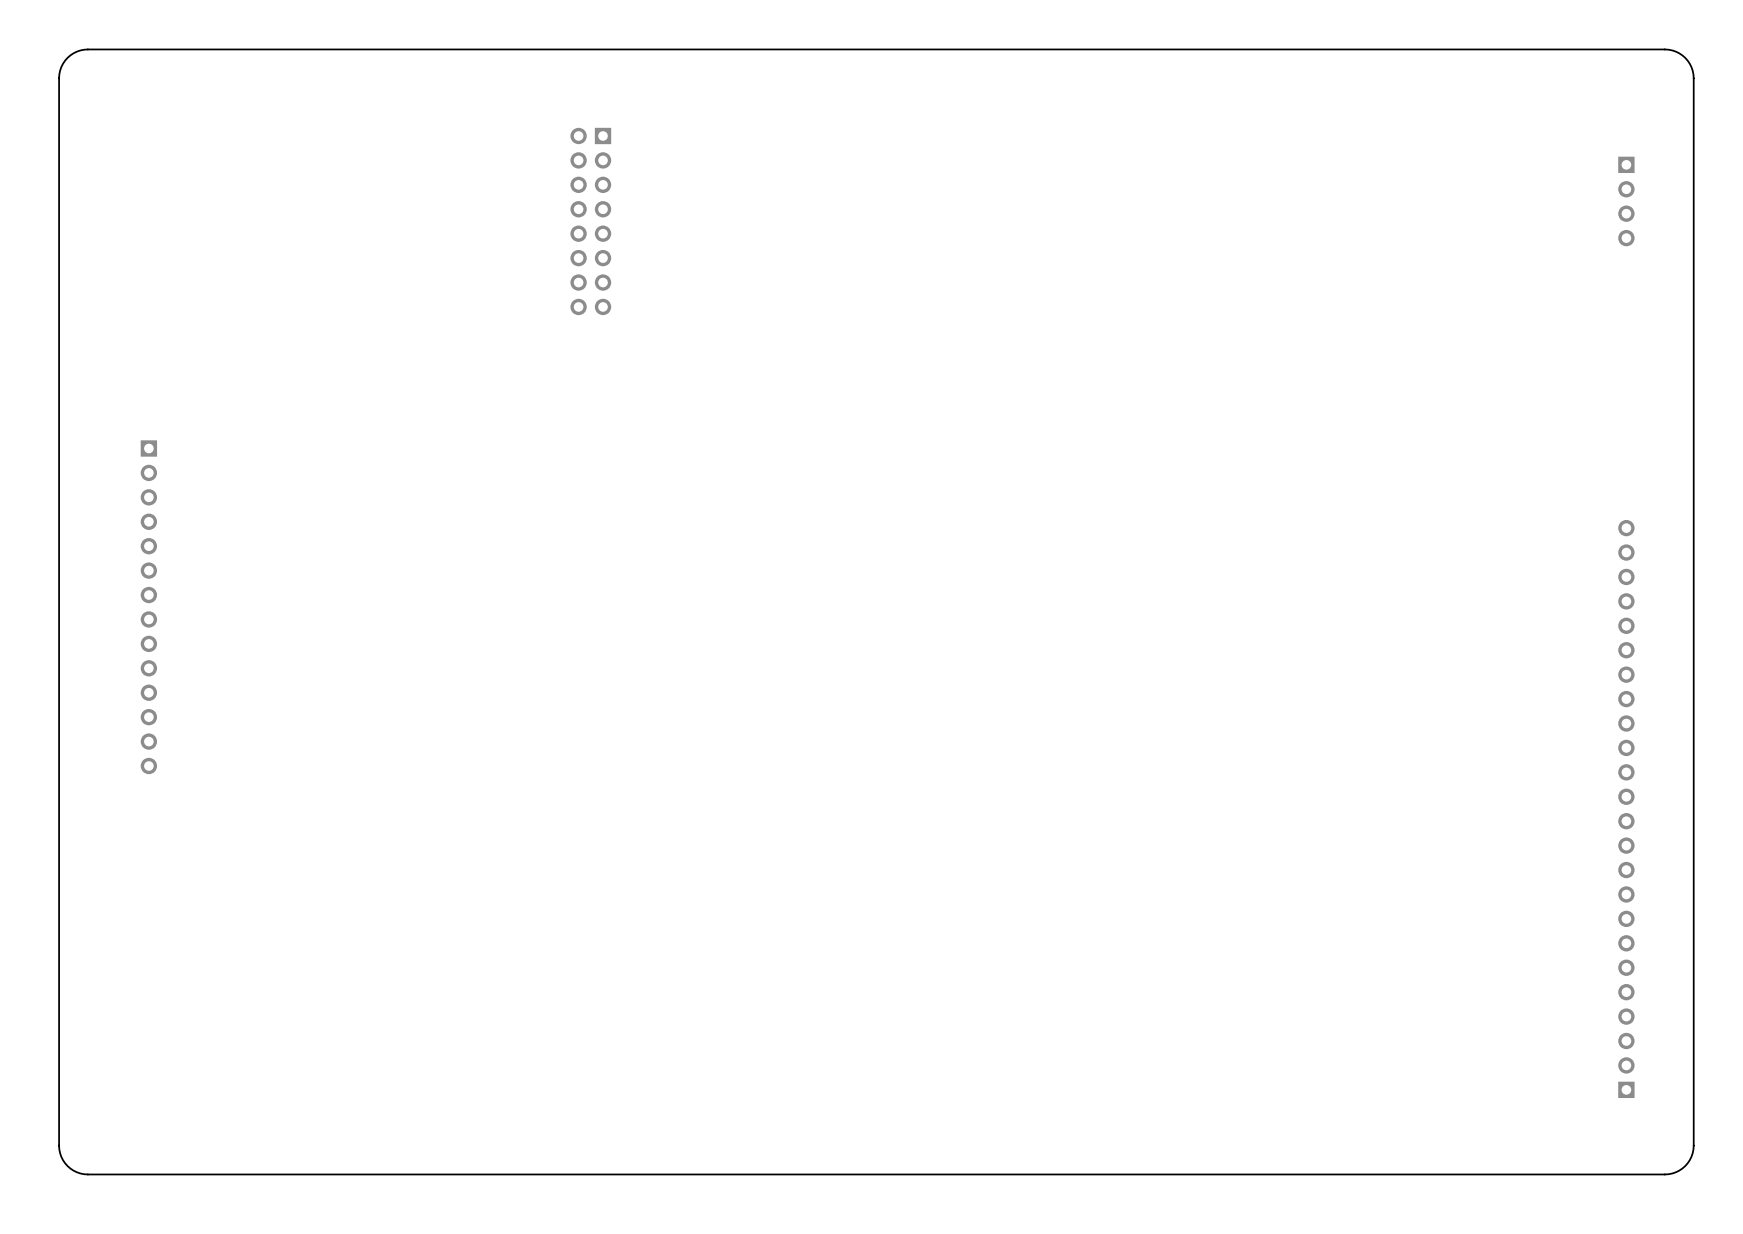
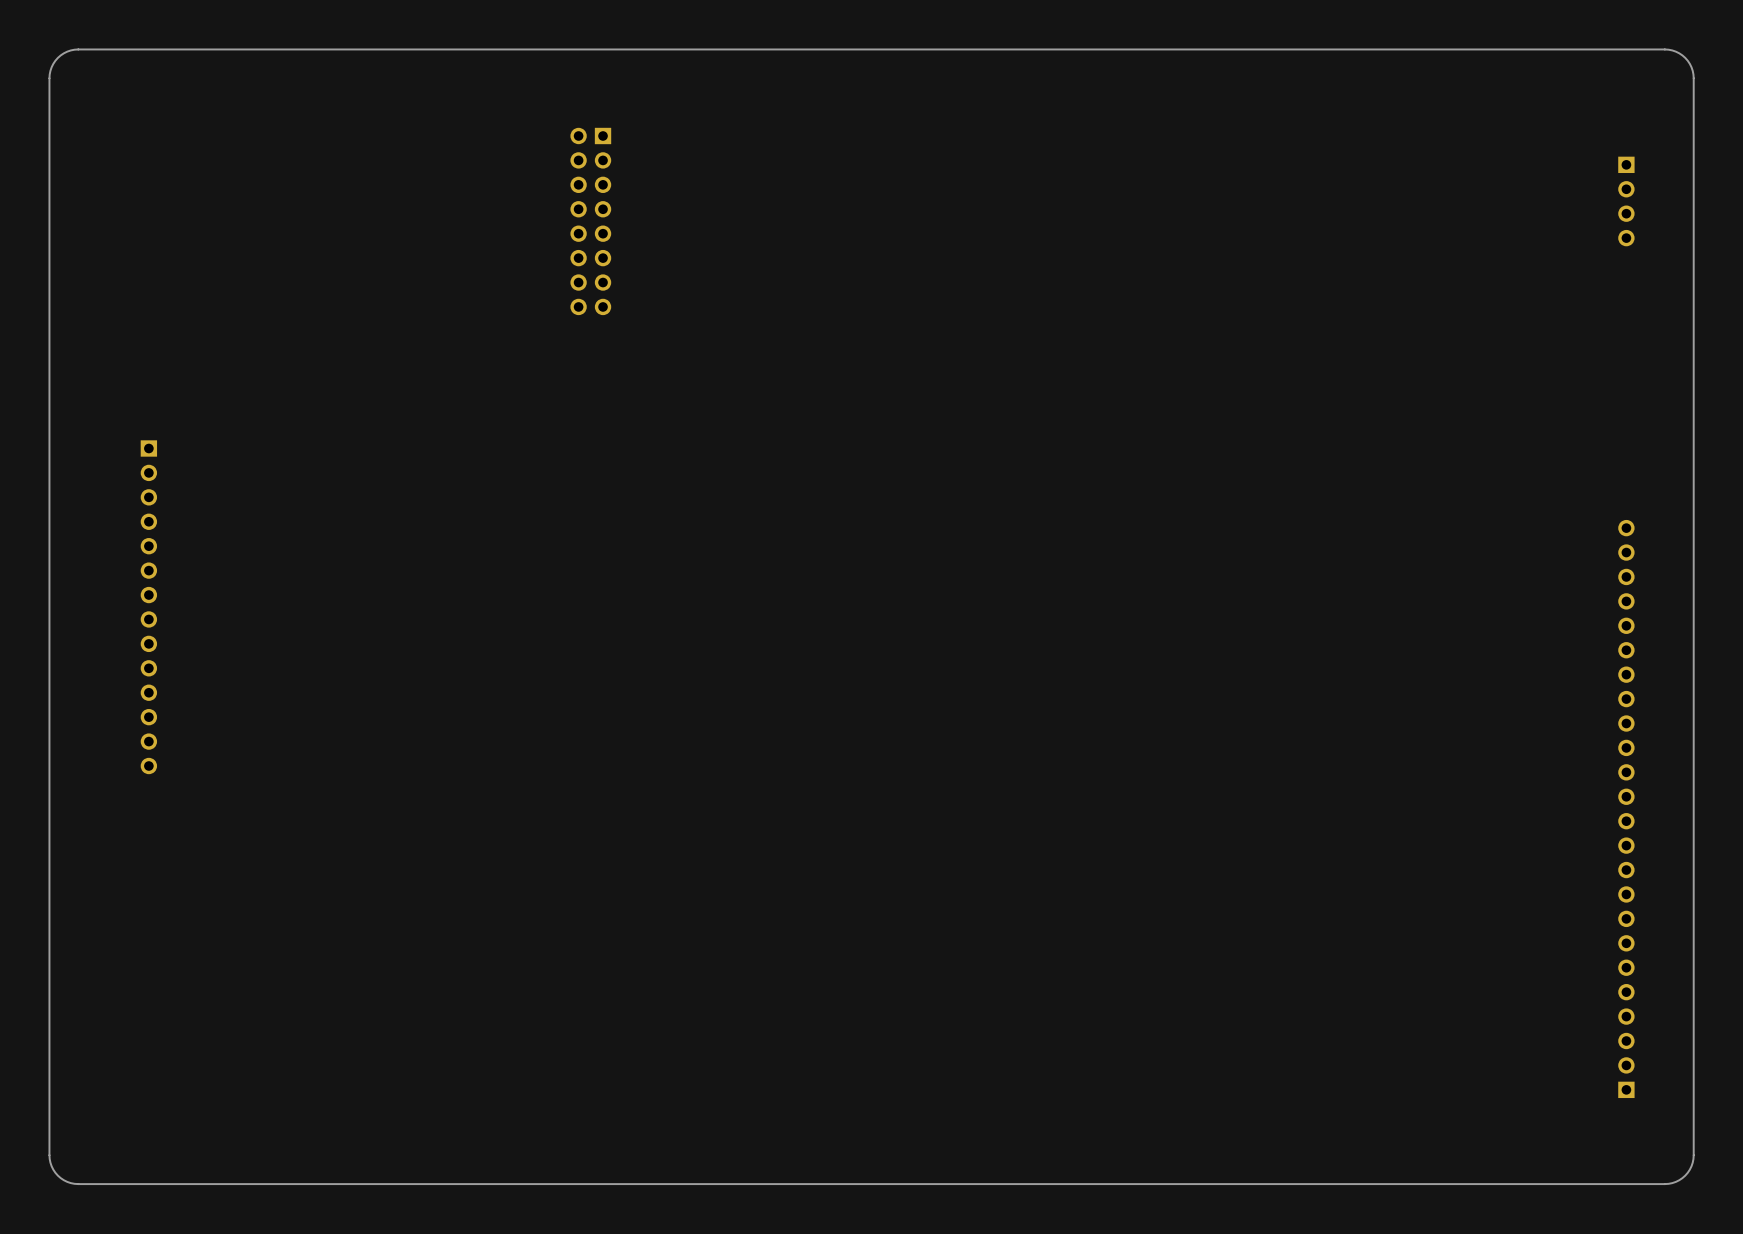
board edge: (87, 49) (76, 51) (67, 57) (61, 67) (59, 78) (59, 1145) (62, 1160) (70, 1168) (87, 1174) (1664, 1174) (1675, 1172) (1685, 1166) (1691, 1156) (1693, 1145) -> (87, 49) (70, 50) (60, 55) (51, 67) (49, 78) (49, 1155) (53, 1169) (60, 1178) (78, 1184) (1664, 1184) (1675, 1181) (1687, 1172) (1692, 1162) (1693, 1145)

